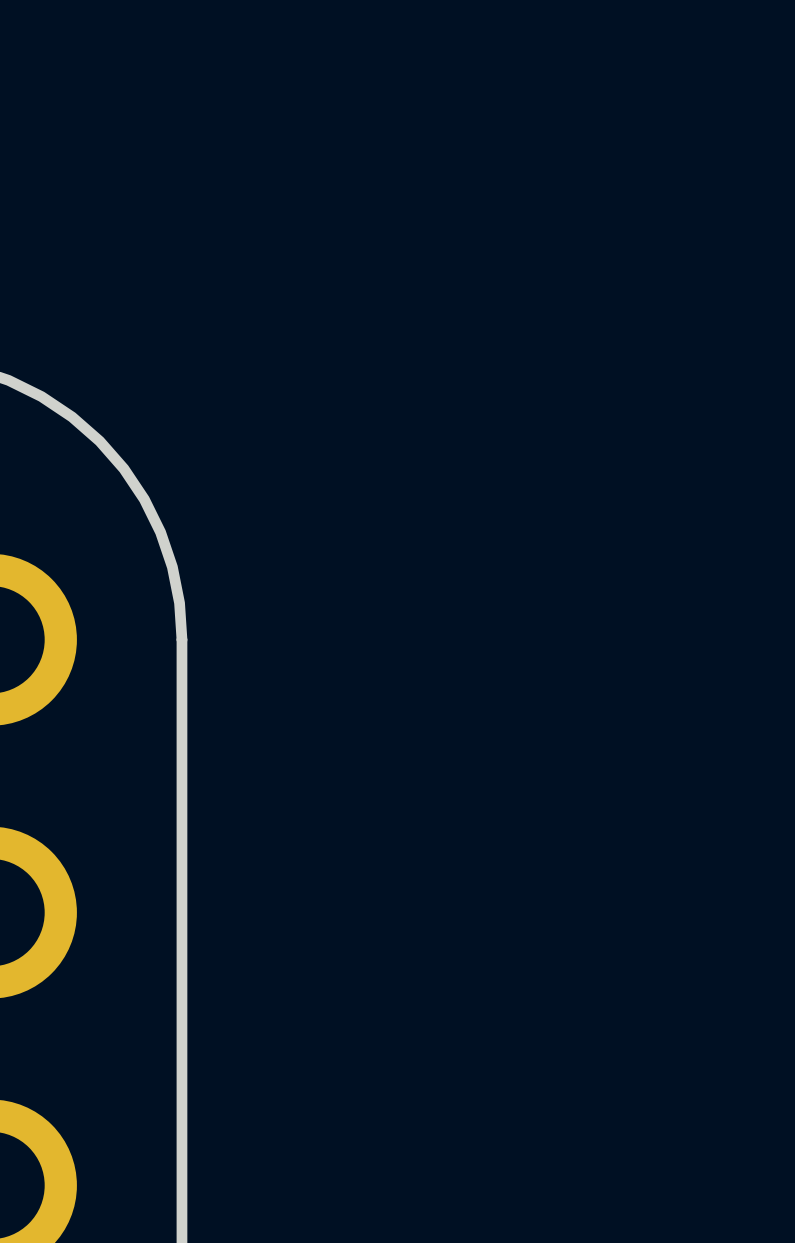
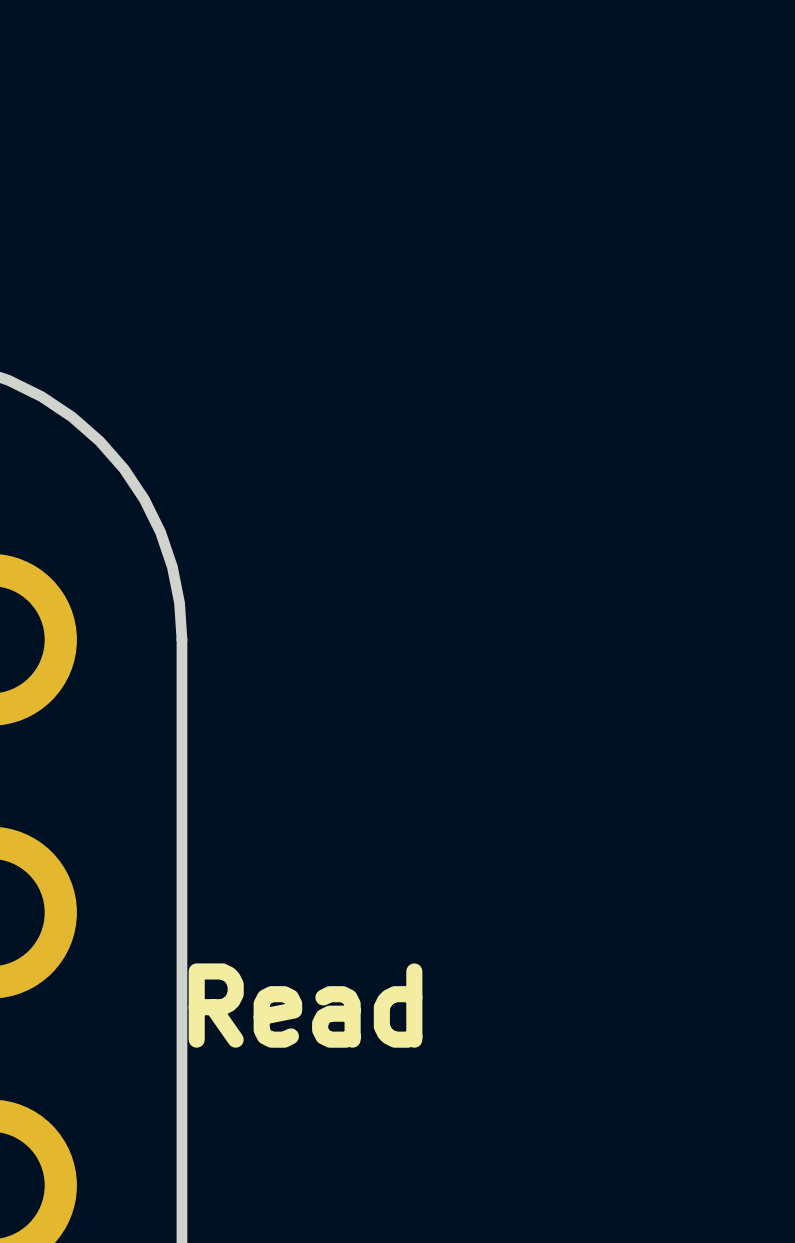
text: none -> Read (305, 1005)

